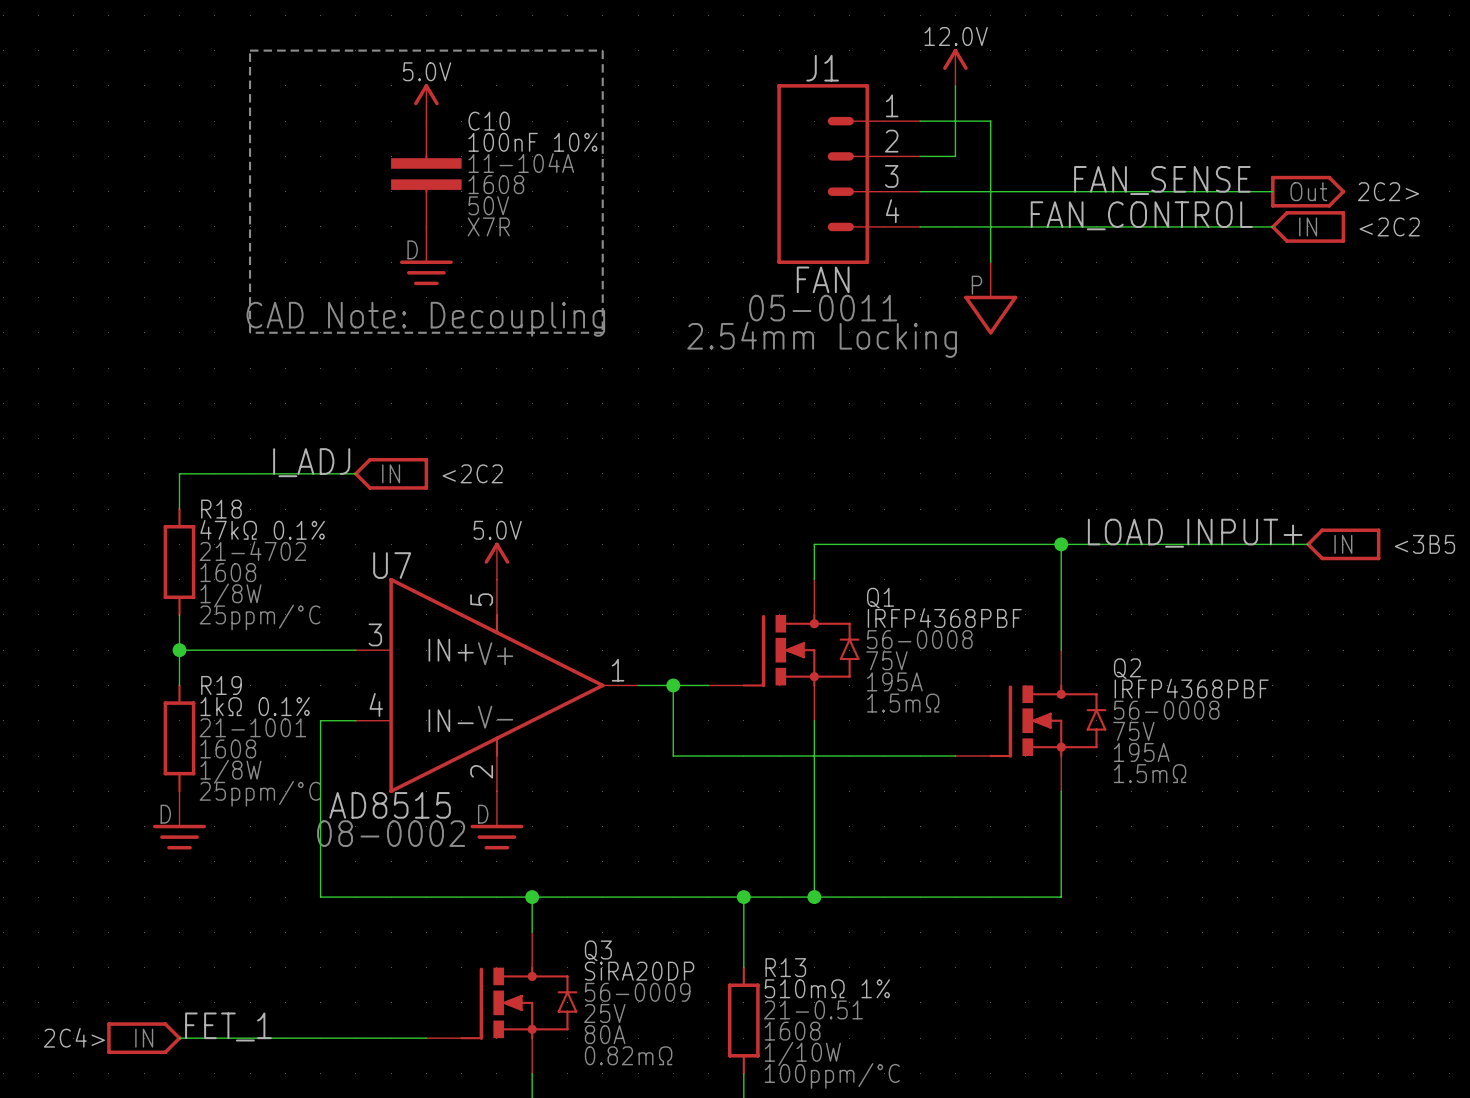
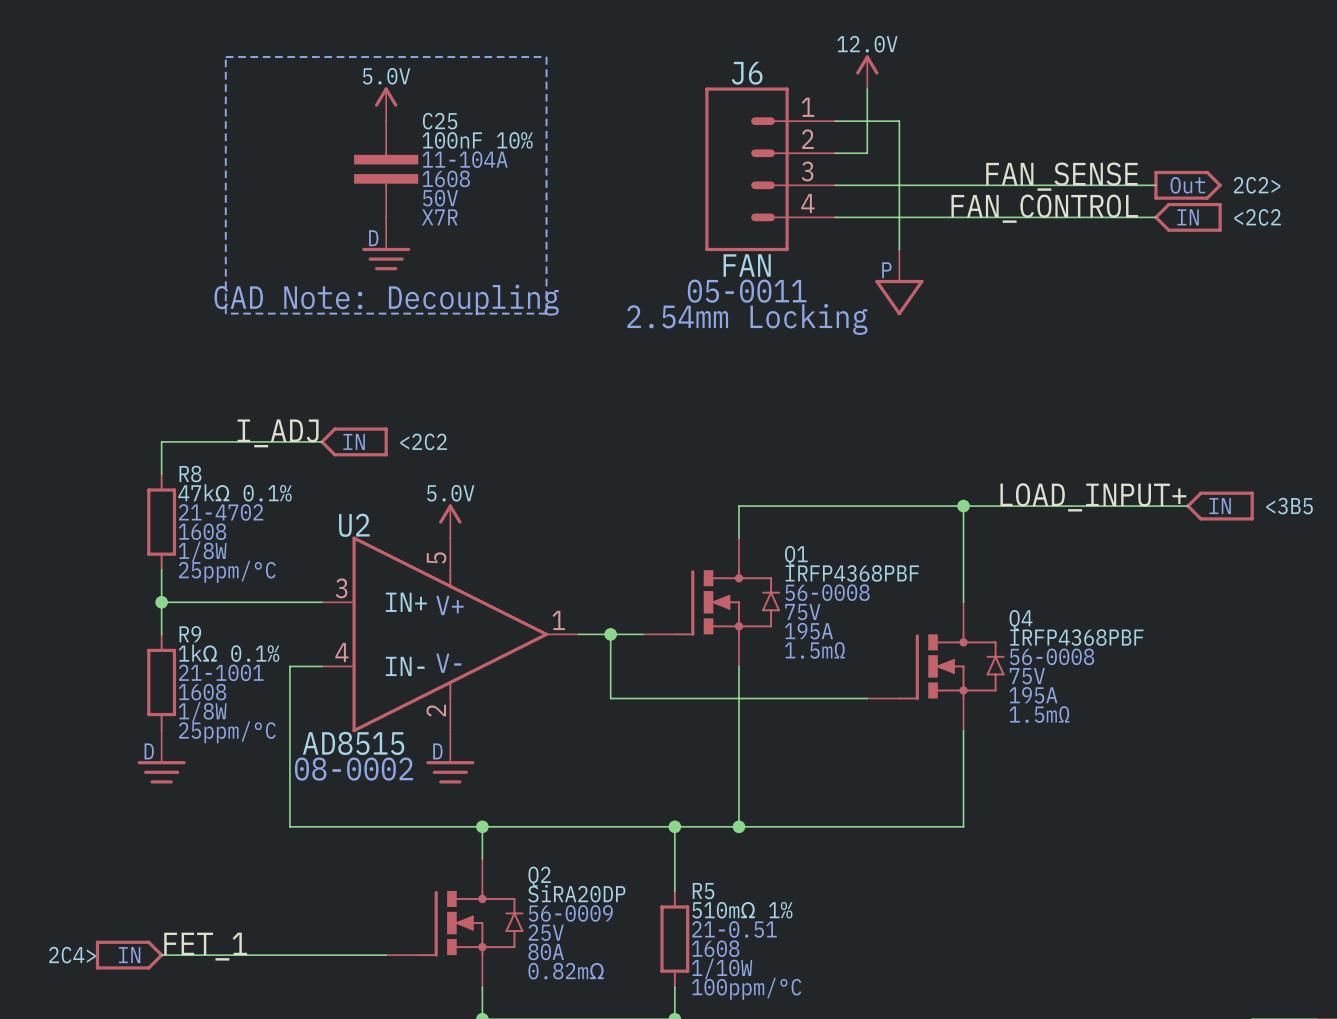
J1 name: J1 (822, 68) -> J6 (747, 73)
C10 name: C10 (489, 121) -> C25 (440, 121)
R18 name: R18 (221, 509) -> R8 (190, 473)
U7 name: U7 (392, 565) -> U2 (354, 525)
Q2 name: Q2 (1127, 668) -> Q4 (1021, 620)
R19 name: R19 (221, 685) -> R9 (190, 634)
Q3 name: Q3 (598, 950) -> Q2 (539, 876)
R13 name: R13 (785, 967) -> R5 (703, 891)

